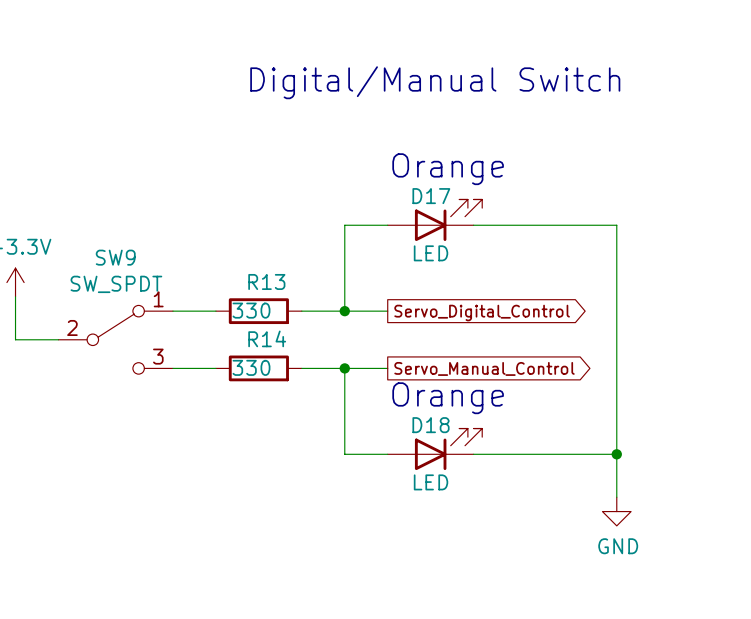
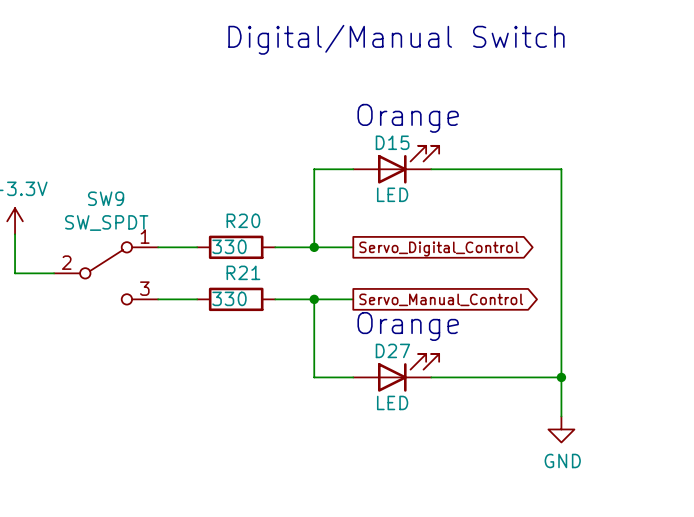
D17 name: D17 (431, 196) -> D15 (392, 142)
R13 name: R13 (266, 281) -> R20 (243, 220)
R14 name: R14 (267, 338) -> R21 (243, 272)
D18 name: D18 (431, 425) -> D27 (392, 350)

